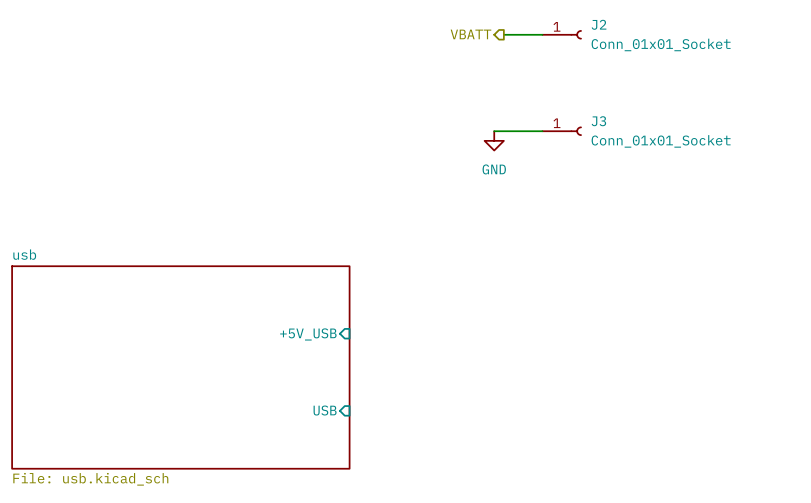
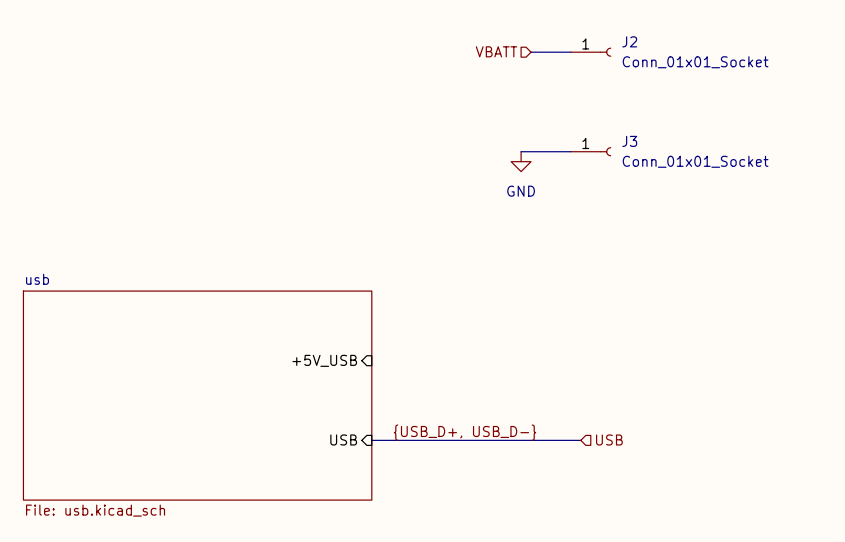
hierarchical label shape: output (470, 34) -> input (496, 51)
label: none -> {USB_D+, USB_D-} (465, 432)
bus: none -> (371, 440) (580, 440)
hierarchical label: none -> USB (609, 440)

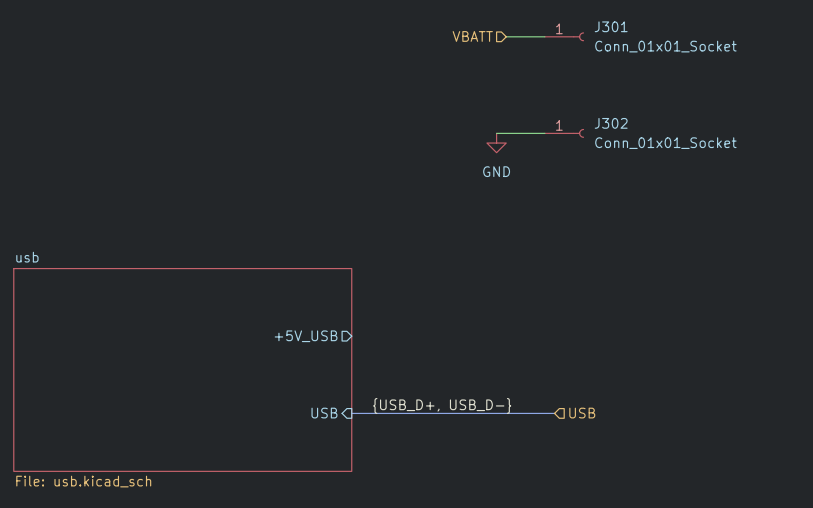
J2 name: J2 (629, 41) -> J301 (611, 26)
J3 name: J3 (629, 141) -> J302 (611, 123)
sheet pin shape: input (324, 360) -> output (306, 336)

